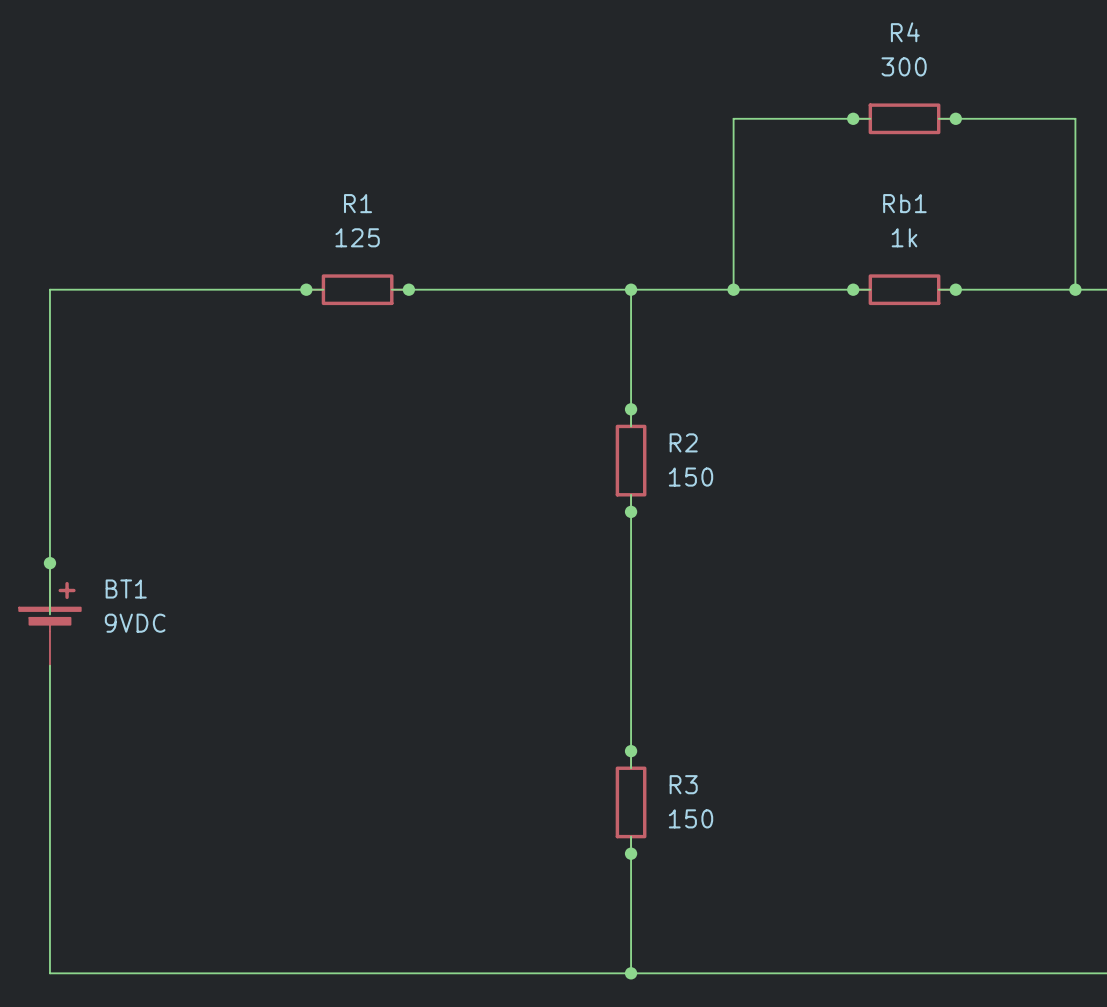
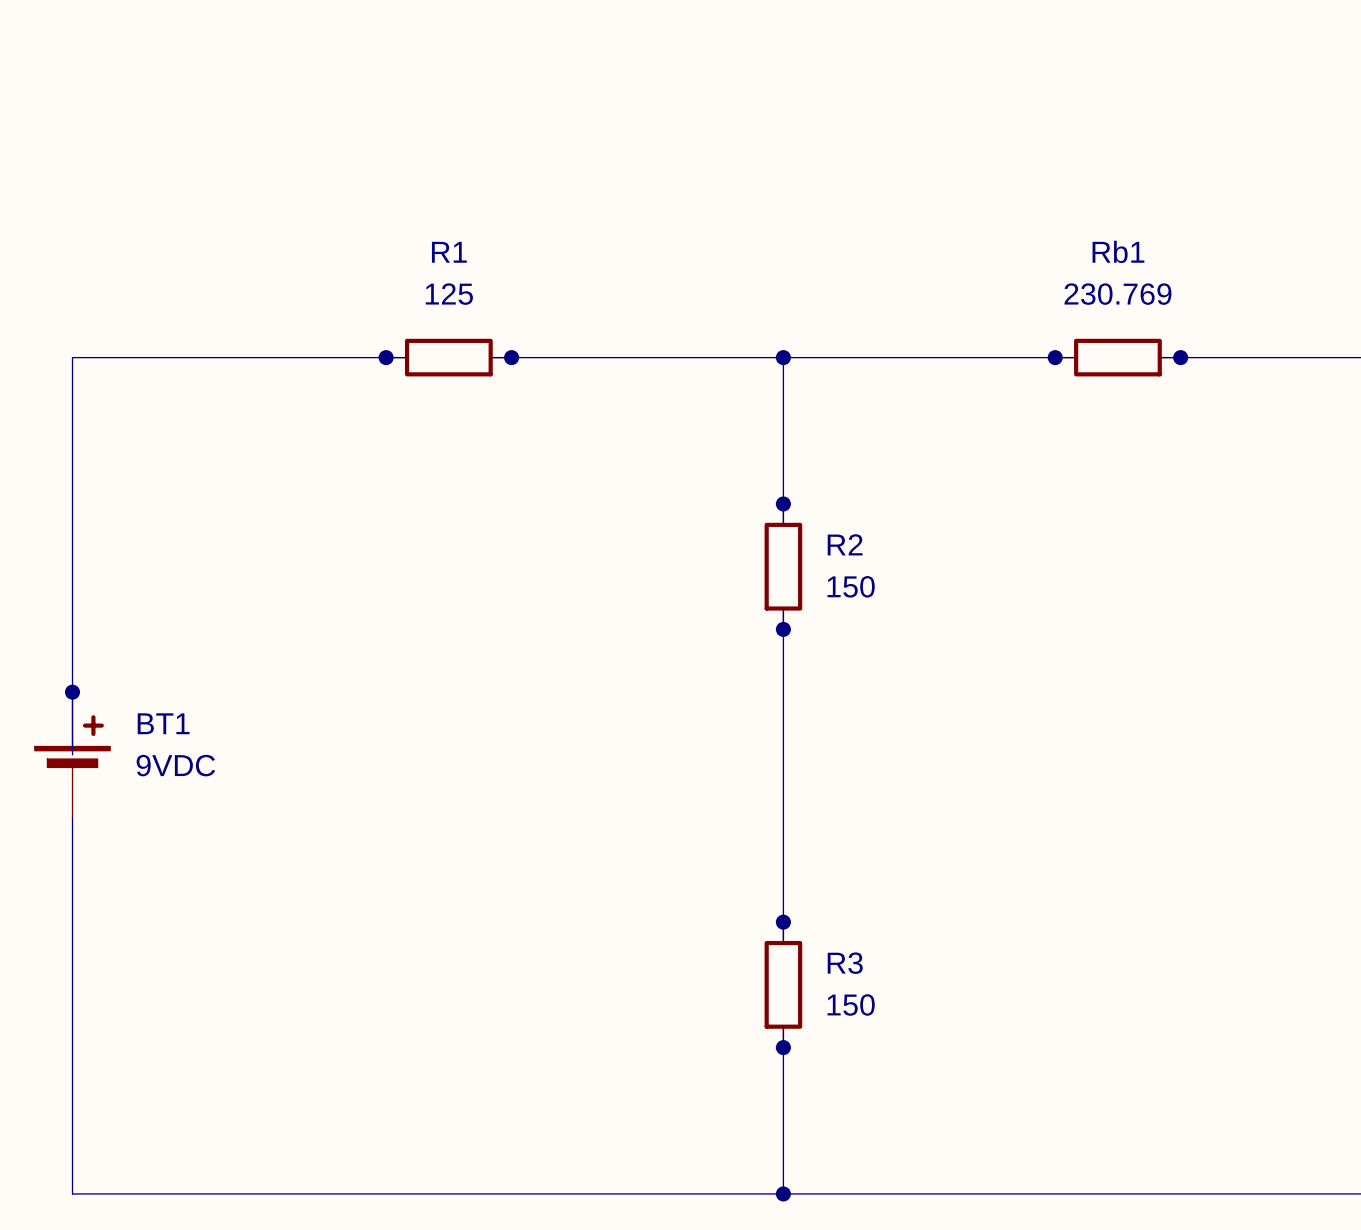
junction: (853, 118) -> none
wire: (870, 118) (733, 118) (733, 289) -> none
R4: 300 (904, 118) -> none
wire: (938, 118) (1075, 118) (1075, 289) -> none
junction: (955, 118) -> none
Rb1 value: 1k (904, 237) -> 230.769 (1117, 294)
junction: (733, 289) -> none
junction: (1075, 289) -> none

